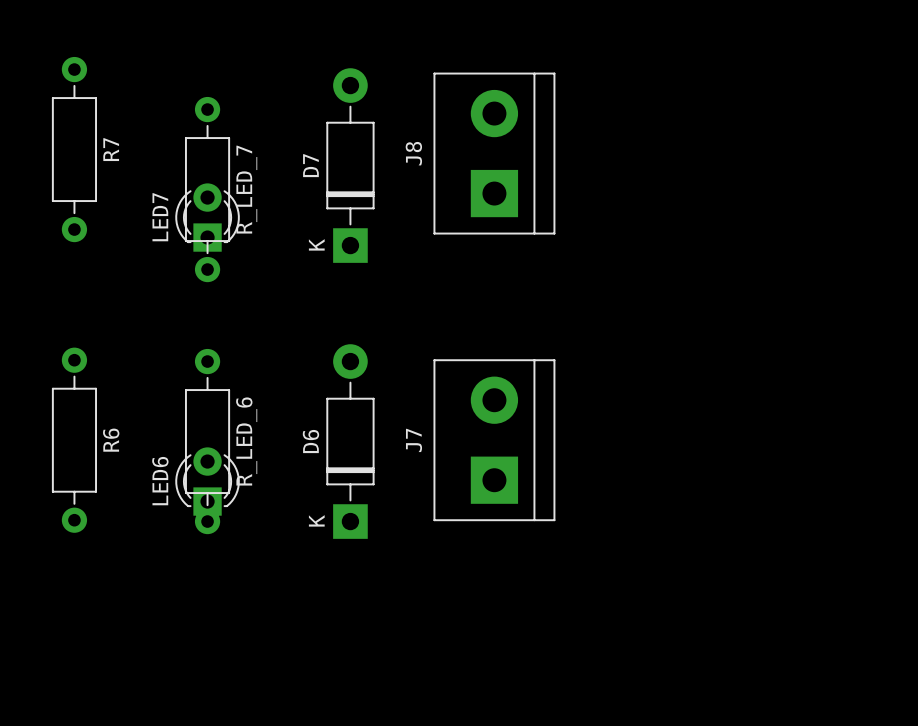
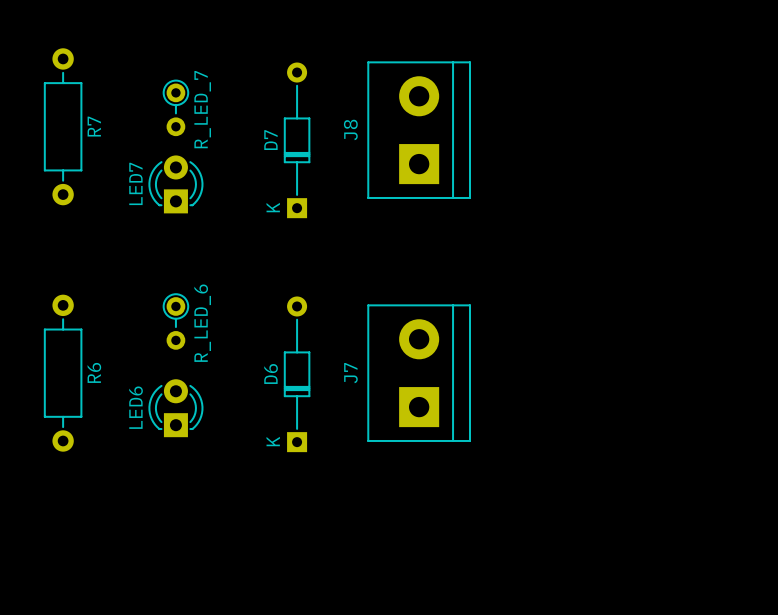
D7 footprint: [326, 68, 375, 263] -> [283, 62, 311, 219]
R_LED_7 footprint: [185, 96, 231, 283] -> [162, 79, 190, 137]
D6 footprint: [326, 344, 375, 539] -> [283, 296, 311, 453]
R_LED_6 footprint: [185, 348, 231, 535] -> [162, 293, 190, 350]

